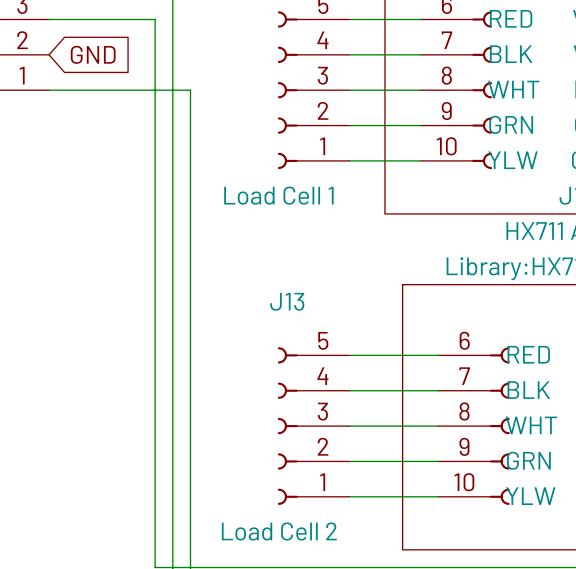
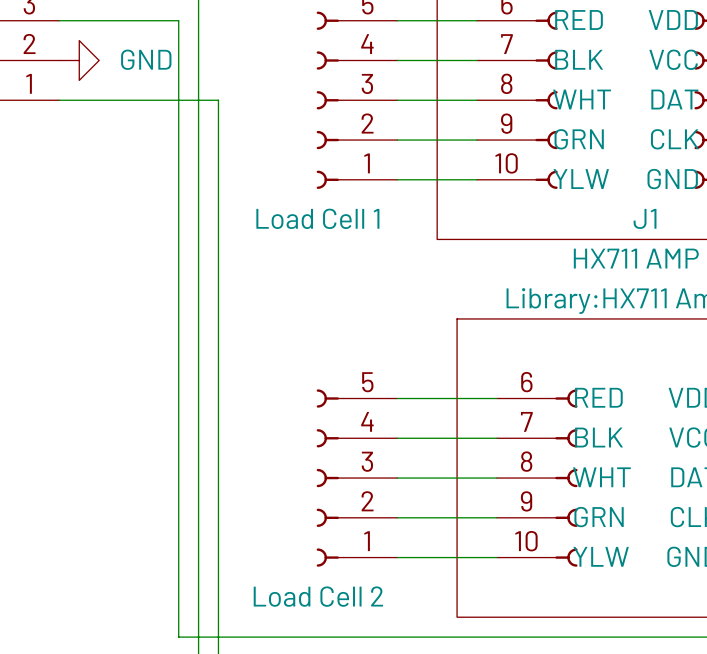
power symbol: none -> GND (79, 60)
global label: GND (93, 54) -> none
J13 name: J13 (287, 301) -> none

